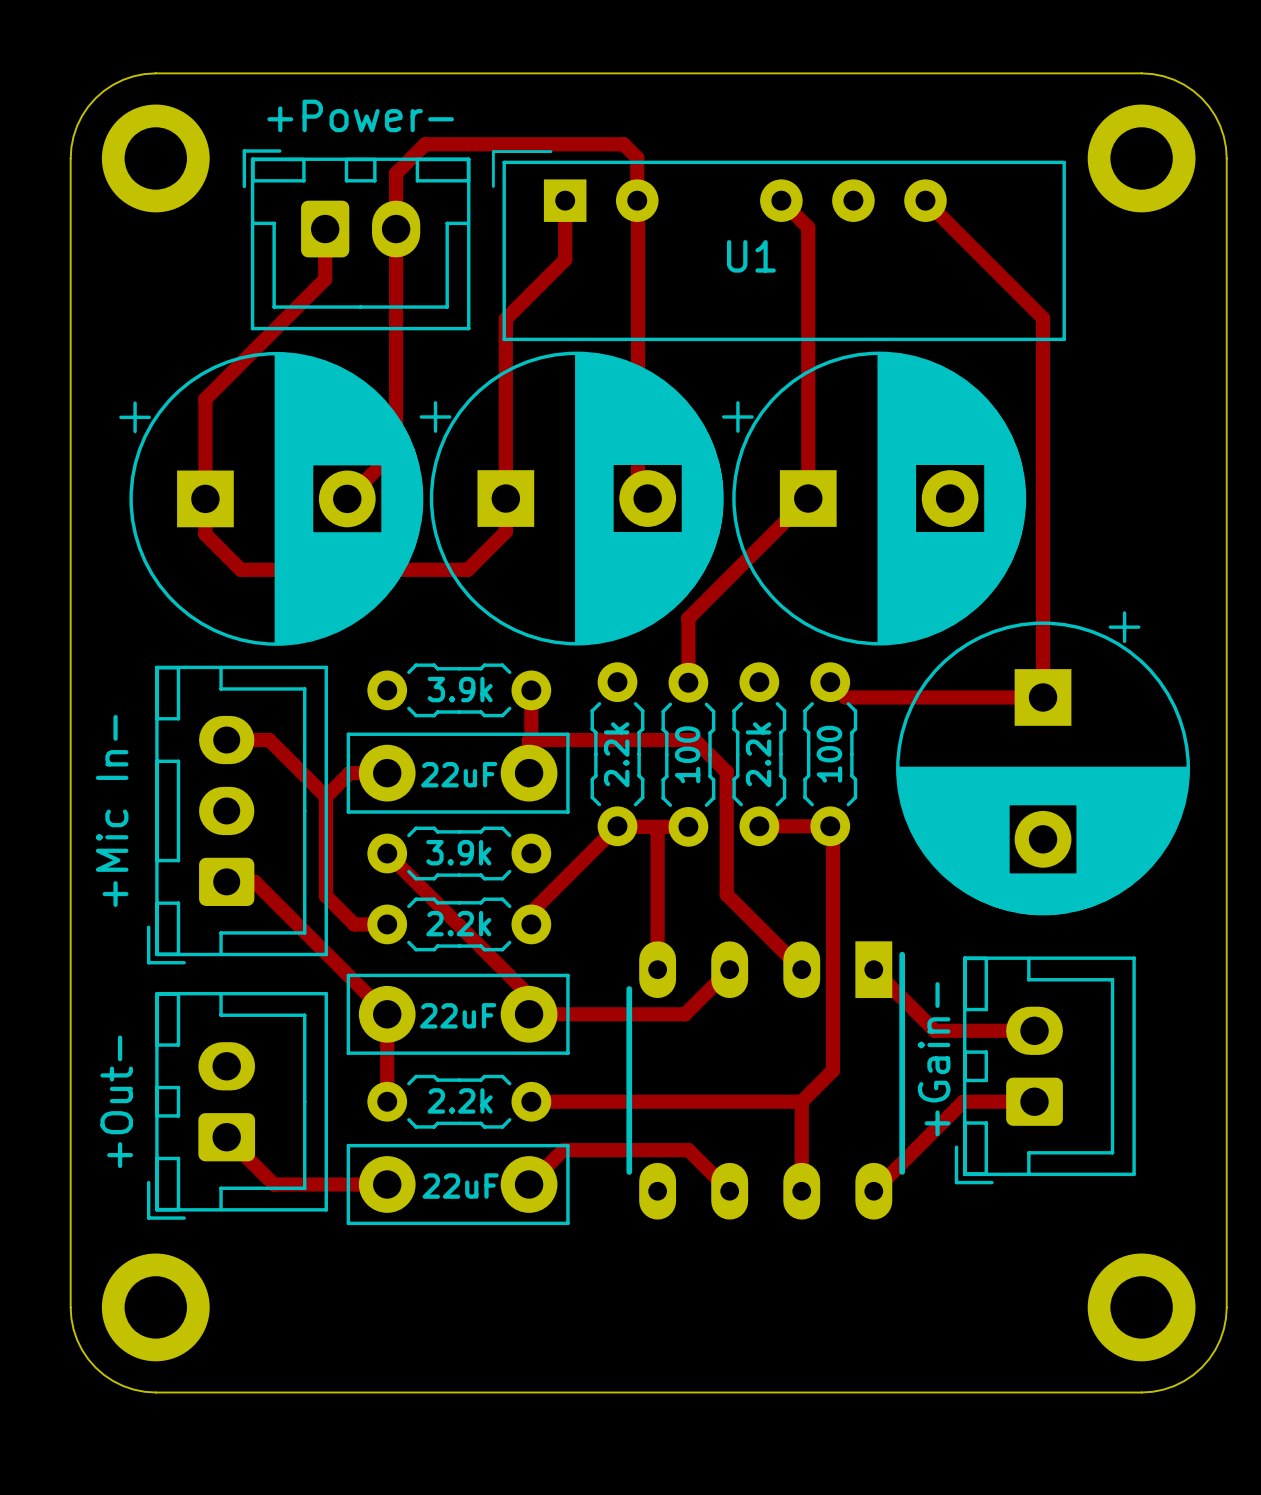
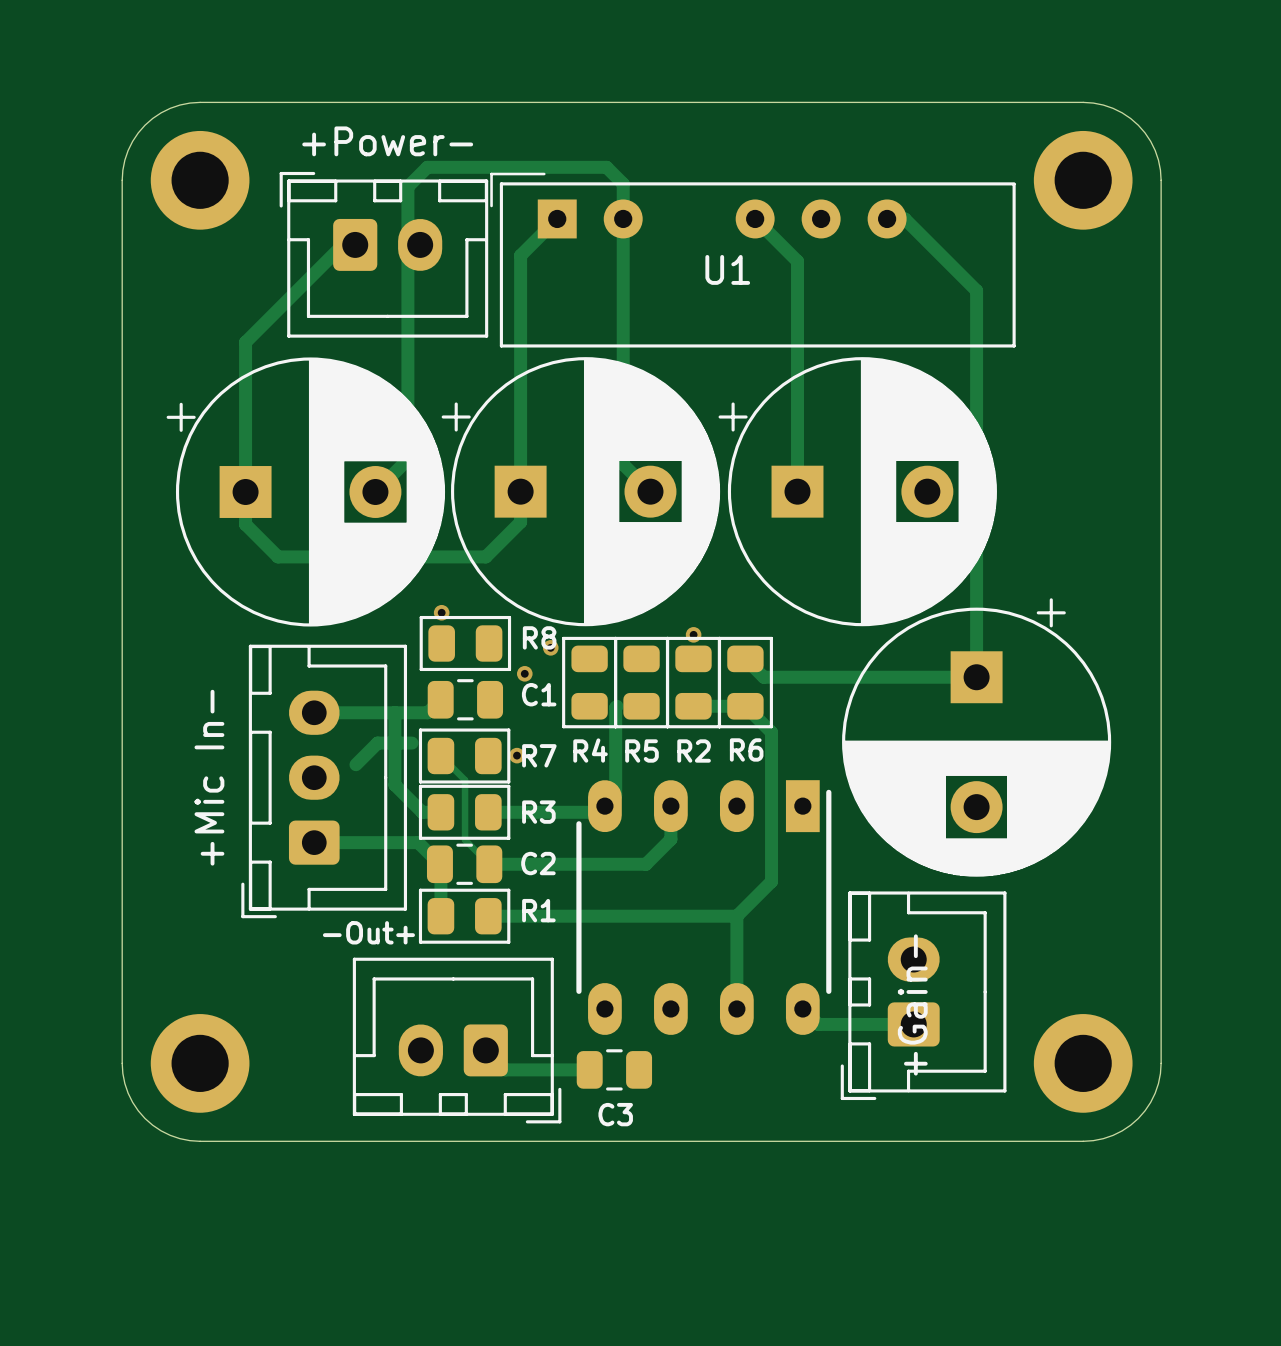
board edge: (1120, 73) (1163, 76) (1193, 90) (1215, 115) (1223, 136) (1226, 158) (1226, 1307) (1220, 1339) (1201, 1367) (1174, 1386) (1141, 1392) (155, 1392) (133, 1389) (113, 1381) (95, 1367) (82, 1349) (73, 1329) (70, 1307) (70, 1123) -> (1083, 102) (1113, 108) (1138, 125) (1155, 150) (1161, 180) (1161, 1063) (1155, 1093) (1138, 1118) (1113, 1135) (1083, 1141) (200, 1141) (170, 1135) (145, 1118) (128, 1093) (122, 1063)
track: (425, 144) (396, 173) (396, 450) (382, 463) -> (446, 167) (427, 167) (407, 186) (407, 459)
track: (599, 144) (623, 144) (637, 157) (638, 488) -> (606, 167) (623, 183) (623, 464) (641, 482)
part position: (1141, 158) -> (1083, 180)
track: (565, 200) (565, 259) (505, 319) -> (557, 218) (520, 255) (520, 327)
track: (781, 200) (808, 227) (808, 246) -> (755, 218) (797, 261)
track: (325, 229) (325, 279) (205, 399) -> (342, 244) (245, 342) (245, 400)
U1 position: (778, 245) -> (752, 260)
track: (1003, 279) (1043, 318) (1043, 697) (845, 697) (830, 682) -> (976, 290) (976, 677) (763, 677) (745, 658)
track: (808, 498) (688, 618) (688, 682) -> none
via: none -> (441, 612)
via: none -> (693, 634)
R8: none -> (465, 643)
via: none -> (550, 647)
part: 3.9k (459, 690) -> none
track: (531, 690) (531, 770) (529, 773) (529, 740) (694, 740) (726, 771) (726, 894) (801, 969) -> none
via: none -> (524, 673)
R4: none -> (589, 682)
R5: none -> (641, 682)
R2: none -> (693, 682)
R6: none -> (745, 682)
track: none -> (440, 699) (427, 712) (314, 712)
C1: none -> (465, 699)
track: none -> (616, 706) (615, 795) (598, 812) (488, 812)
track: none -> (693, 706) (745, 706) (771, 732) (771, 881) (736, 916)
track: (226, 740) (269, 740) (326, 796) (326, 896) (354, 924) (387, 924) -> none
track: none -> (394, 712) (394, 784) (422, 812) (440, 812)
part: 2.2k (617, 754) -> none
part: 100 (688, 754) -> none
part: 2.2k (759, 754) -> none
part: 100 (830, 754) -> none
part position: (1043, 763) -> (976, 737)
part: 22uF (458, 773) -> none
via: none -> (516, 755)
track: none -> (440, 756) (465, 780) (465, 840) (489, 864) (646, 864) (670, 839) (670, 806)
R7: none -> (464, 756)
part position: (237, 815) -> (324, 781)
track: (652, 826) (657, 832) (657, 969) -> none
track: (688, 826) (617, 826) (531, 912) (531, 924) -> none
track: (759, 826) (830, 826) (832, 828) (832, 1070) (801, 1101) -> none
R3: none -> (464, 812)
track: (387, 853) (529, 995) (529, 1014) (685, 1014) (729, 969) -> none
part: 3.9k (459, 853) -> none
track: (226, 881) (254, 881) (387, 1014) (387, 1101) -> none
track: none -> (314, 842) (418, 842) (440, 865) (440, 916)
C2: none -> (464, 864)
part: 2.2k (459, 924) -> none
R1: none -> (464, 916)
track: none -> (488, 916) (736, 916)
track: none -> (736, 916) (736, 1008)
track: (873, 969) (934, 1030) (1034, 1030) -> none
part: 22uF (458, 1014) -> none
track: none -> (802, 1008) (818, 1024) (913, 1024)
part position: (1045, 1070) -> (923, 995)
part footprint: [367, 1074, 552, 1129] -> [352, 957, 562, 1124]
part position: (765, 1080) -> (703, 907)
part value: 2.2k (460, 1100) -> -Out+ (368, 932)
track: (531, 1101) (801, 1101) -> none
track: (801, 1101) (801, 1191) -> none
track: (1034, 1101) (963, 1101) (873, 1191) -> none
part: +Out- (237, 1105) -> none
track: none -> (485, 1050) (505, 1069) (589, 1069)
C3: none -> (614, 1069)
track: (226, 1137) (273, 1184) (387, 1184) -> none
part: 22uF (458, 1184) -> none
track: (529, 1184) (563, 1150) (688, 1150) (729, 1191) -> none
part position: (155, 1307) -> (200, 1063)
part position: (1141, 1307) -> (1083, 1063)

